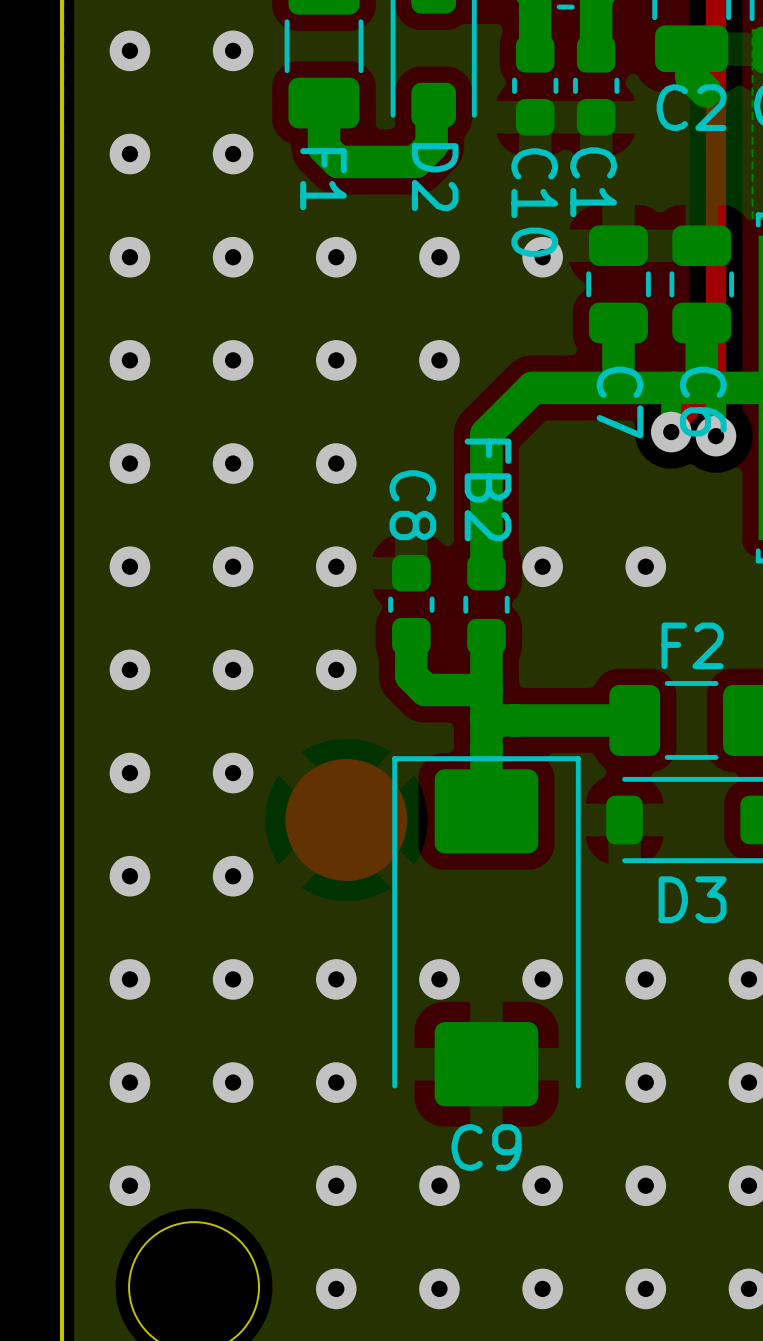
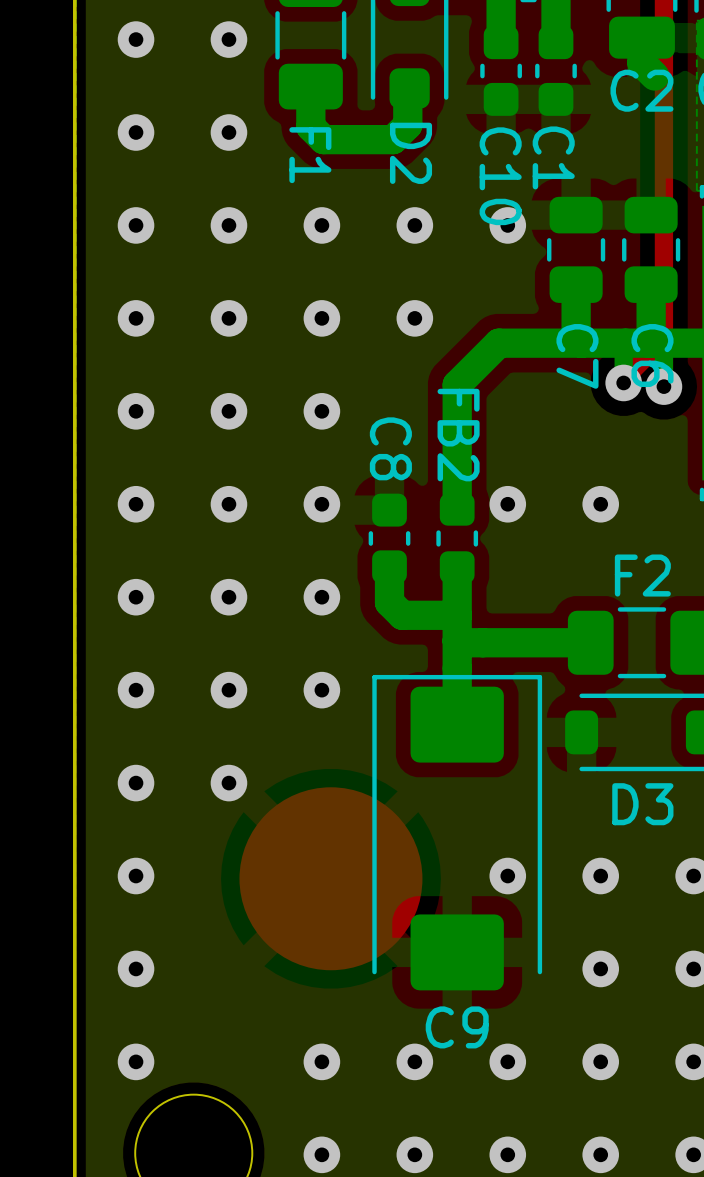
via: none -> (321, 690)
part: (346, 819) -> none
via: (233, 979) -> none
via: (336, 979) -> none
via: (439, 979) -> none
part: none -> (330, 878)
via: (233, 1082) -> none
via: (336, 1082) -> none

